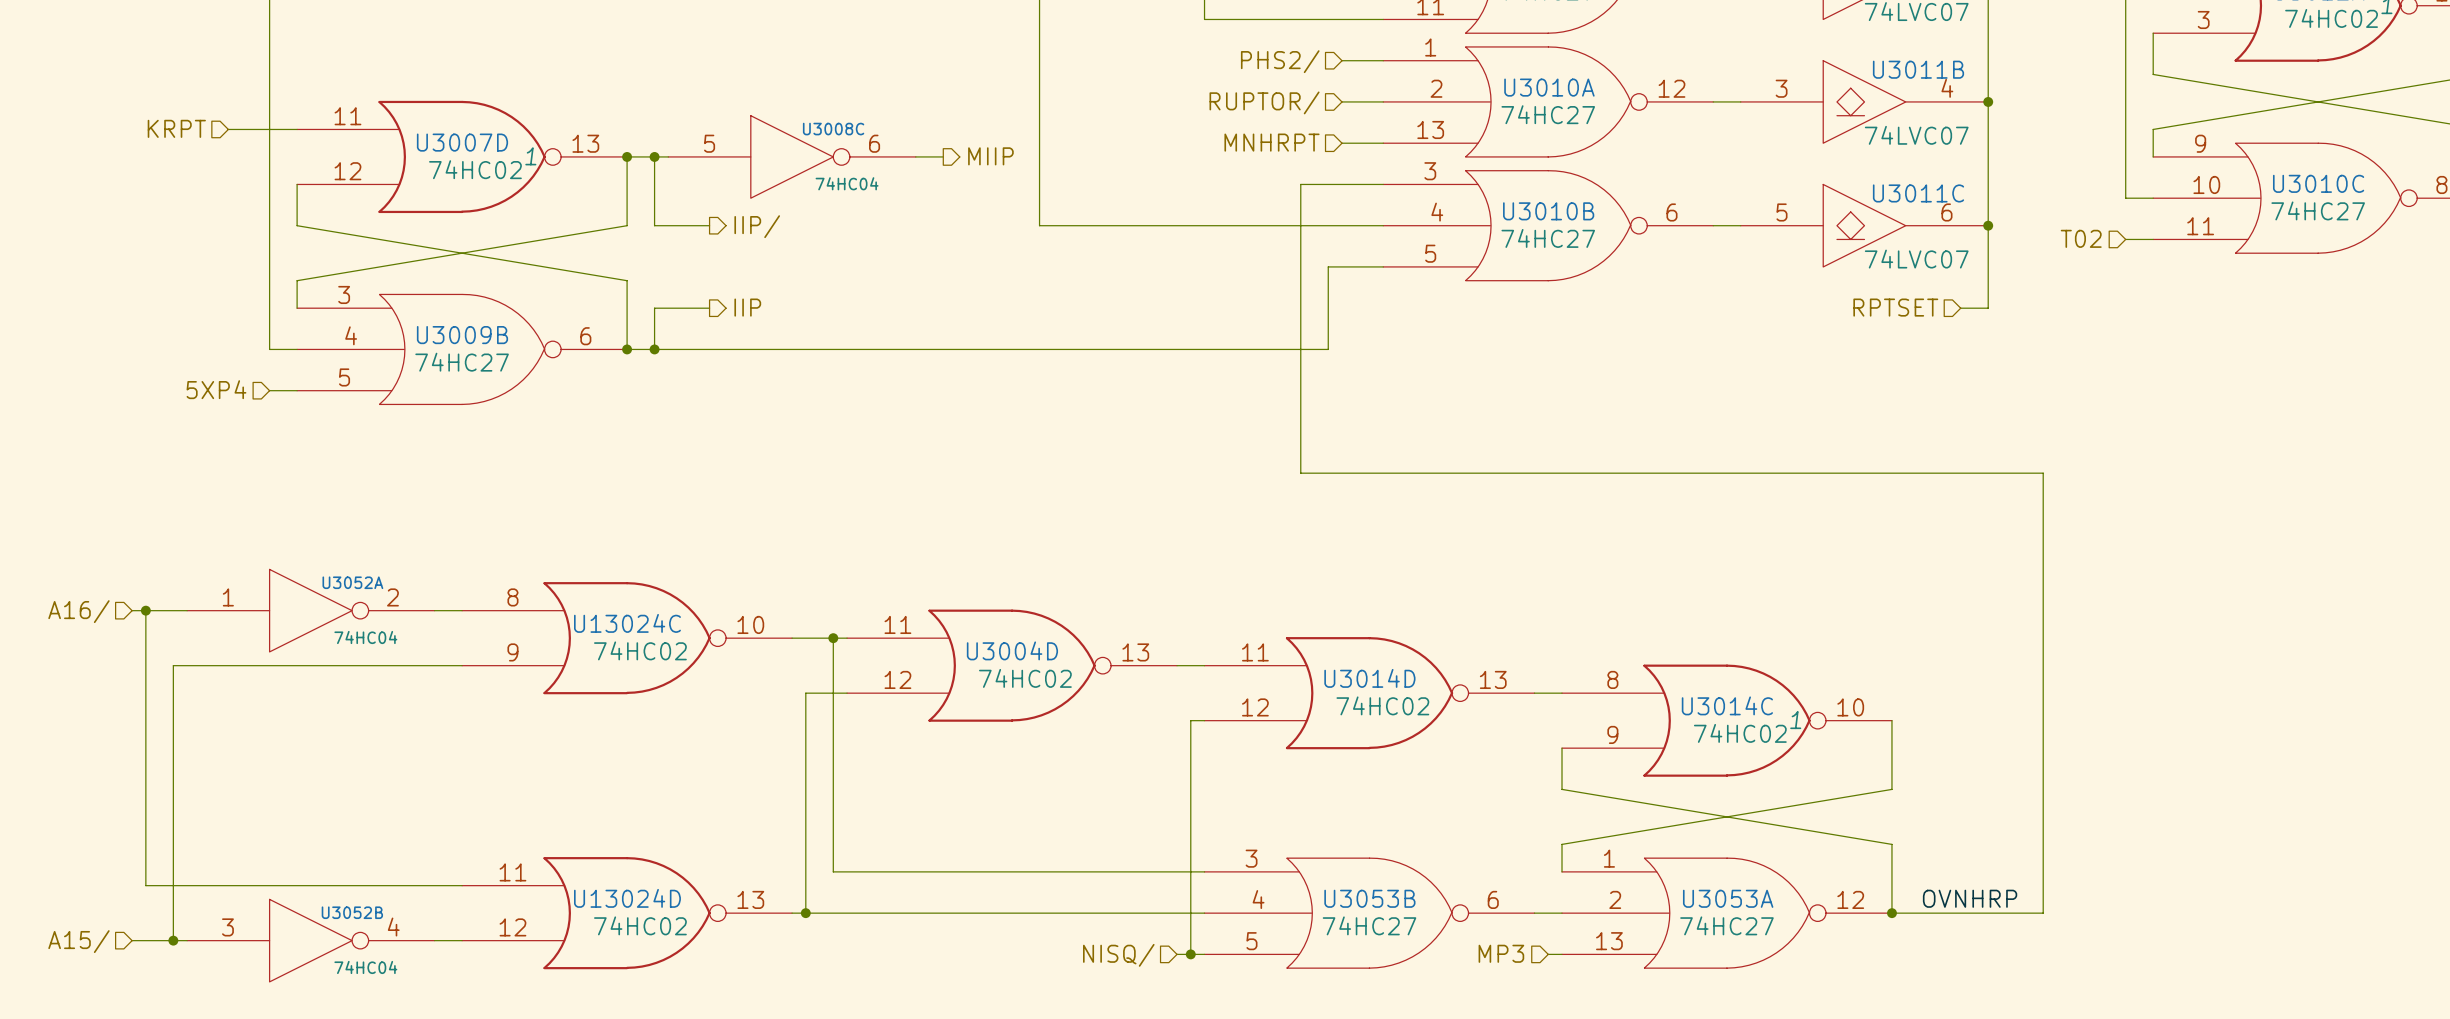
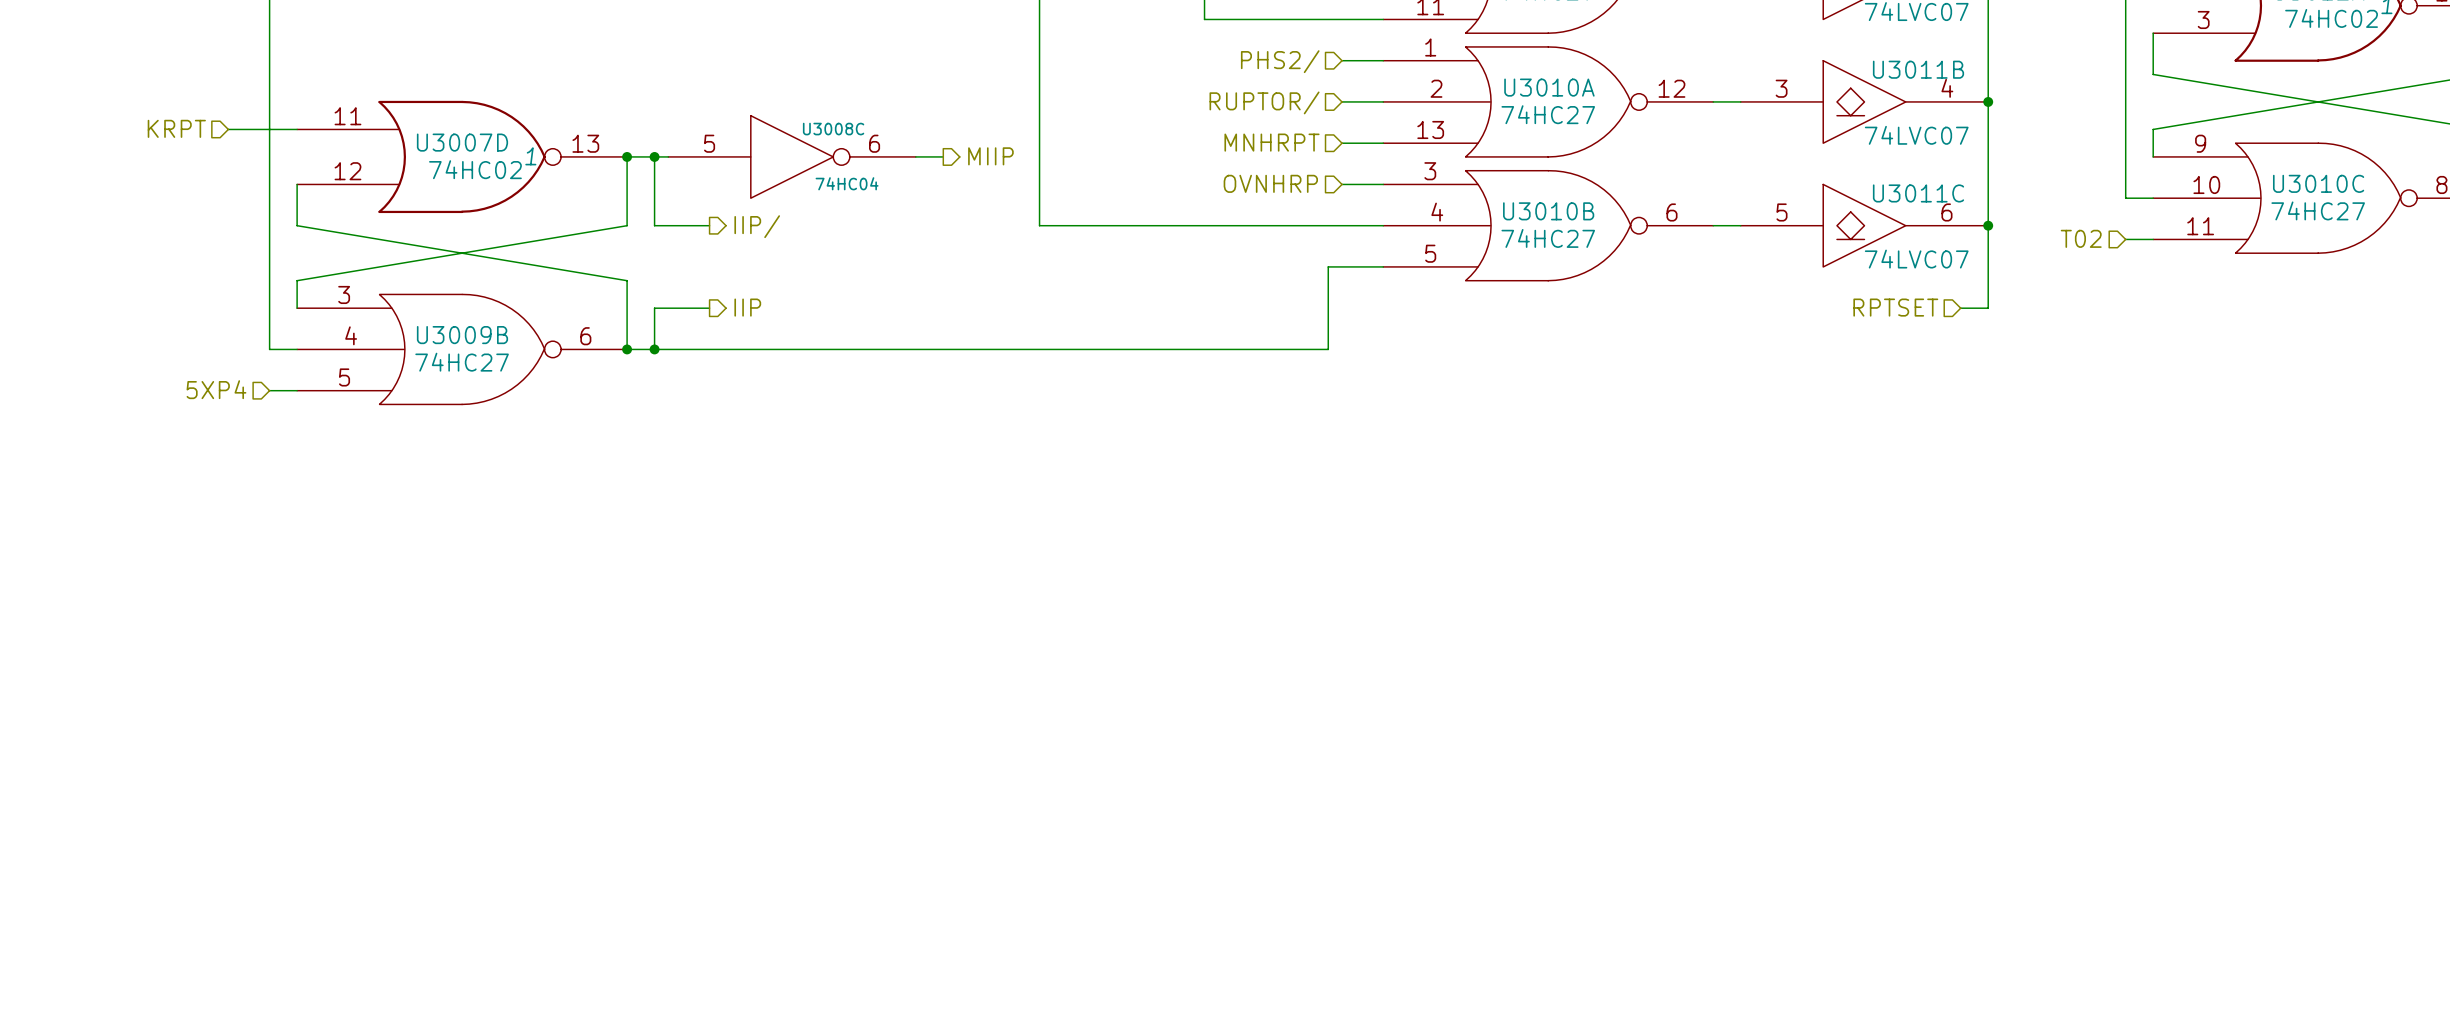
hierarchical label: none -> OVNHRP (1270, 183)
wire: (1342, 184) (1300, 184) (1300, 473) (2043, 473) (2043, 913) (1891, 913) (1891, 844) (1562, 789) (1562, 748) -> none
wire: (132, 610) (187, 610) -> none
wire: (145, 610) (145, 885) (462, 885) -> none
junction: (145, 610) -> none
U3052A: 74HC04 (310, 610) -> none
wire: (434, 610) (462, 610) -> none
hierarchical label: A16/ (78, 611) -> none
U13024C: 74HC02 (627, 638) -> none
wire: (792, 638) (847, 638) -> none
wire: (833, 638) (833, 871) (1204, 871) -> none
junction: (833, 638) -> none
wire: (462, 665) (173, 665) (173, 940) -> none
U3004D: 74HC02 (1012, 665) -> none
wire: (1177, 665) (1204, 665) -> none
wire: (847, 693) (805, 693) (805, 913) -> none
U3014D: 74HC02 (1369, 693) -> none
wire: (1534, 693) (1562, 693) -> none
wire: (1204, 720) (1190, 720) (1190, 954) -> none
U3014C: 74HC02 (1726, 720) -> none
wire: (1891, 720) (1891, 789) (1562, 844) (1562, 871) -> none
label: OVNHRP (1970, 898) -> none
U13024D: 74HC02 (627, 913) -> none
wire: (792, 913) (1204, 913) -> none
junction: (805, 913) -> none
U3053B: 74HC27 (1369, 913) -> none
wire: (1534, 913) (1562, 913) -> none
U3053A: 74HC27 (1726, 913) -> none
junction: (1891, 913) -> none
wire: (132, 940) (187, 940) -> none
junction: (173, 940) -> none
U3052B: 74HC04 (310, 940) -> none
wire: (434, 940) (462, 940) -> none
hierarchical label: A15/ (78, 941) -> none
hierarchical label: MP3 (1501, 953) -> none
wire: (1177, 954) (1204, 954) -> none
junction: (1190, 954) -> none
wire: (1548, 954) (1562, 954) -> none
hierarchical label: NISQ/ (1118, 955) -> none

